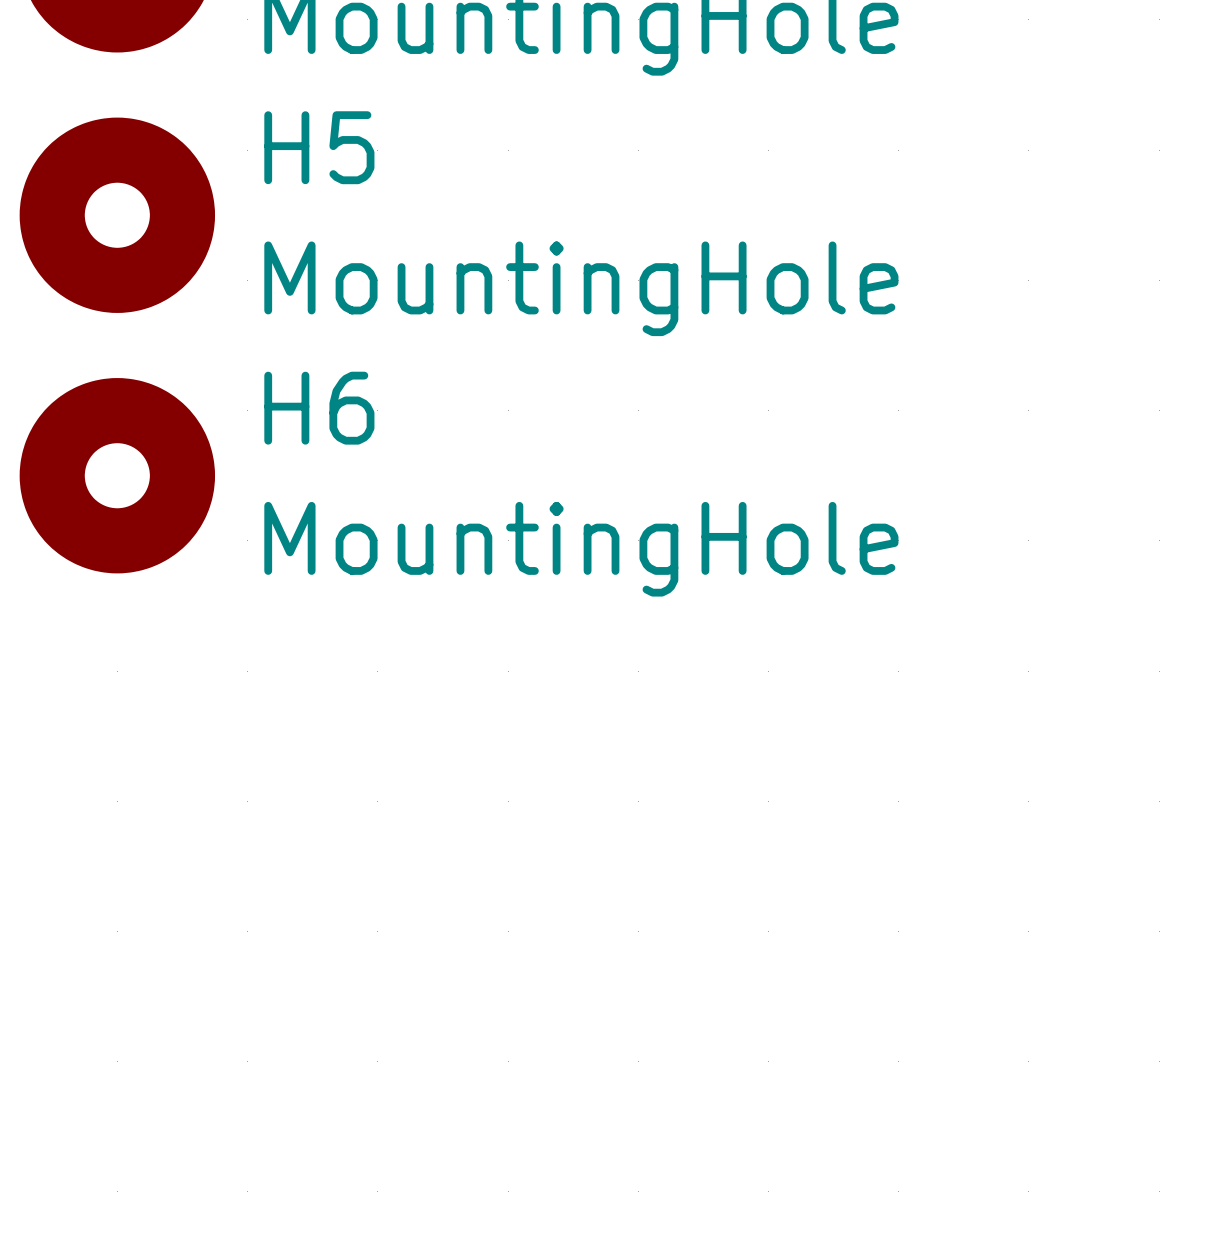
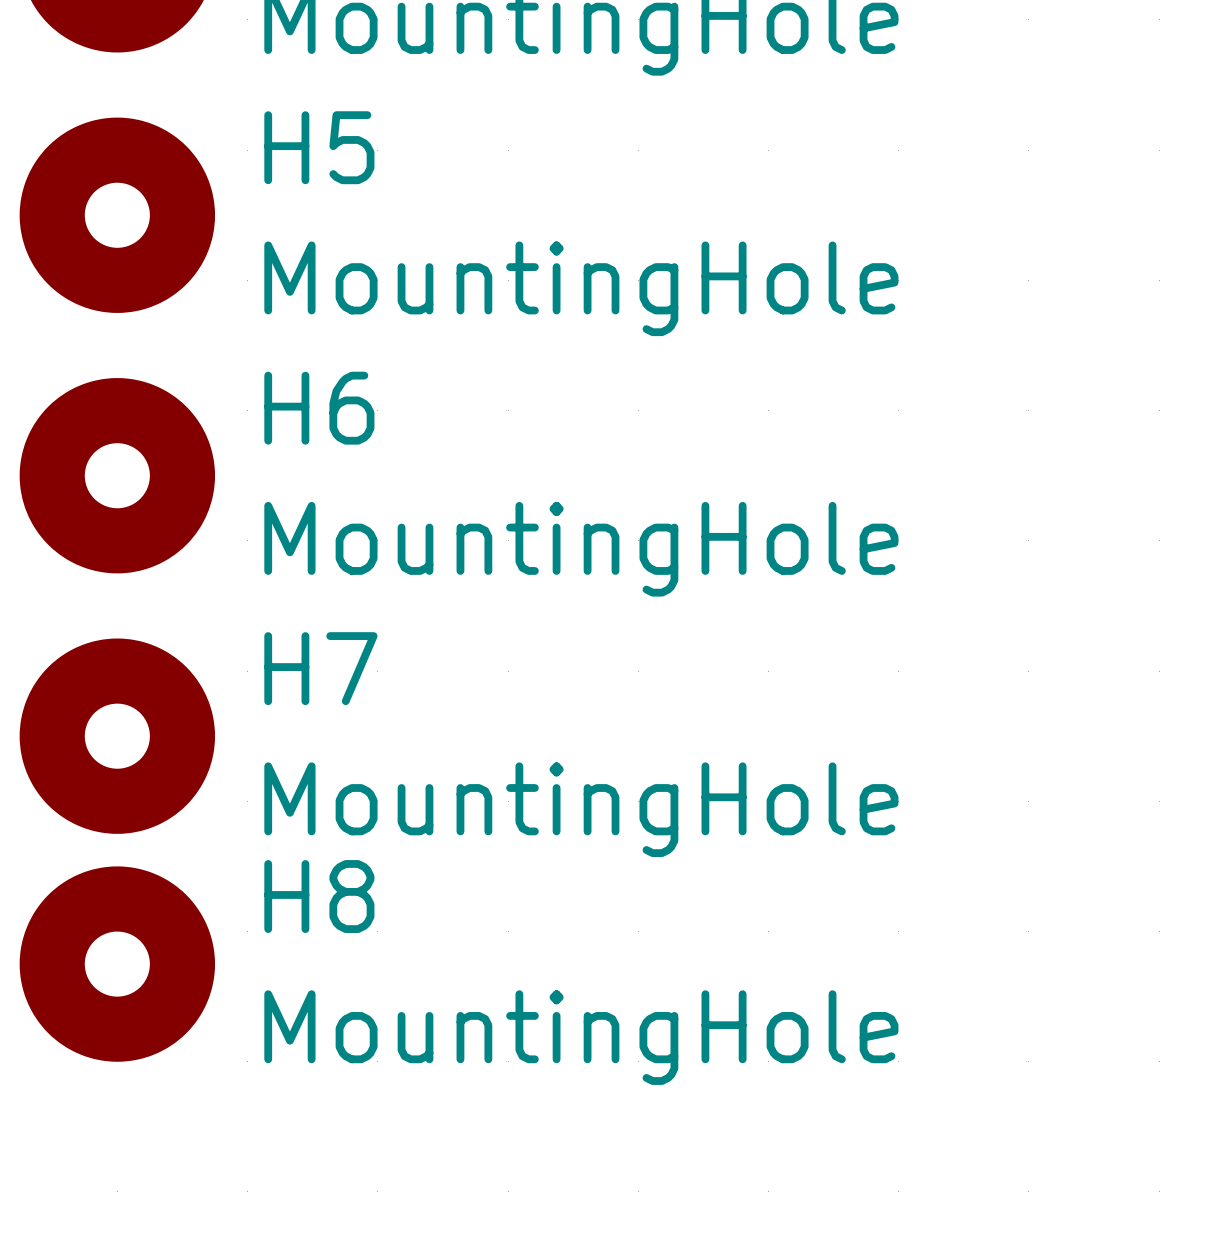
H7: none -> MountingHole (117, 736)
H8: none -> MountingHole (117, 964)

